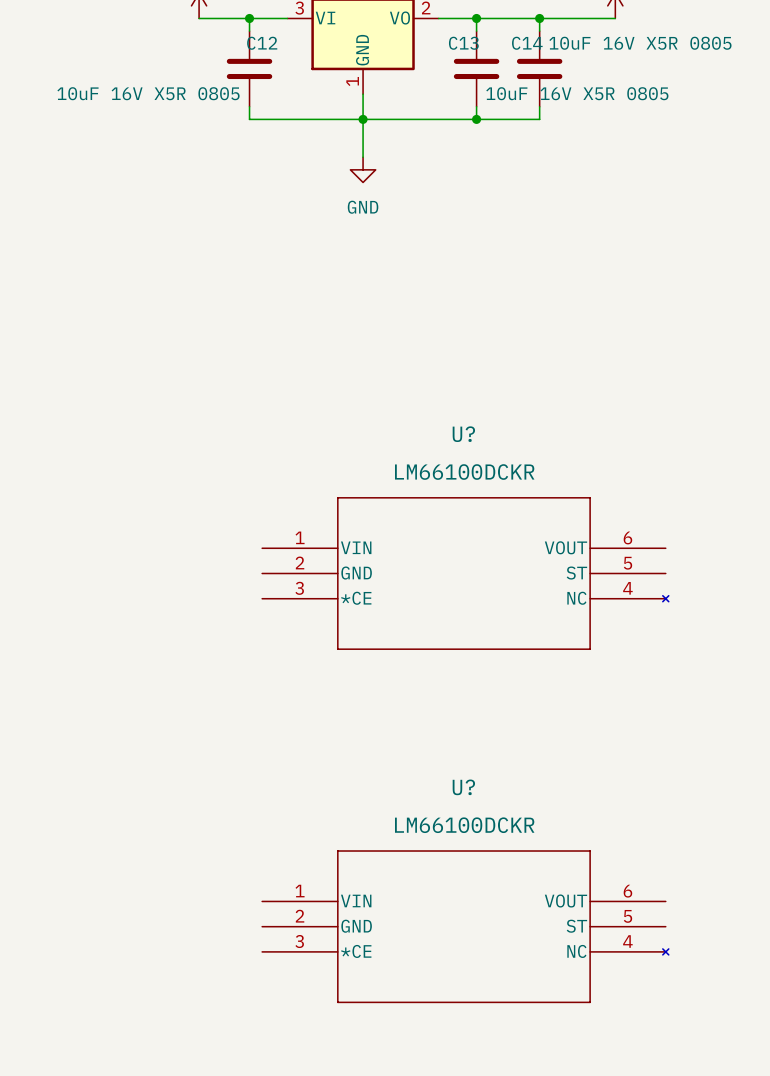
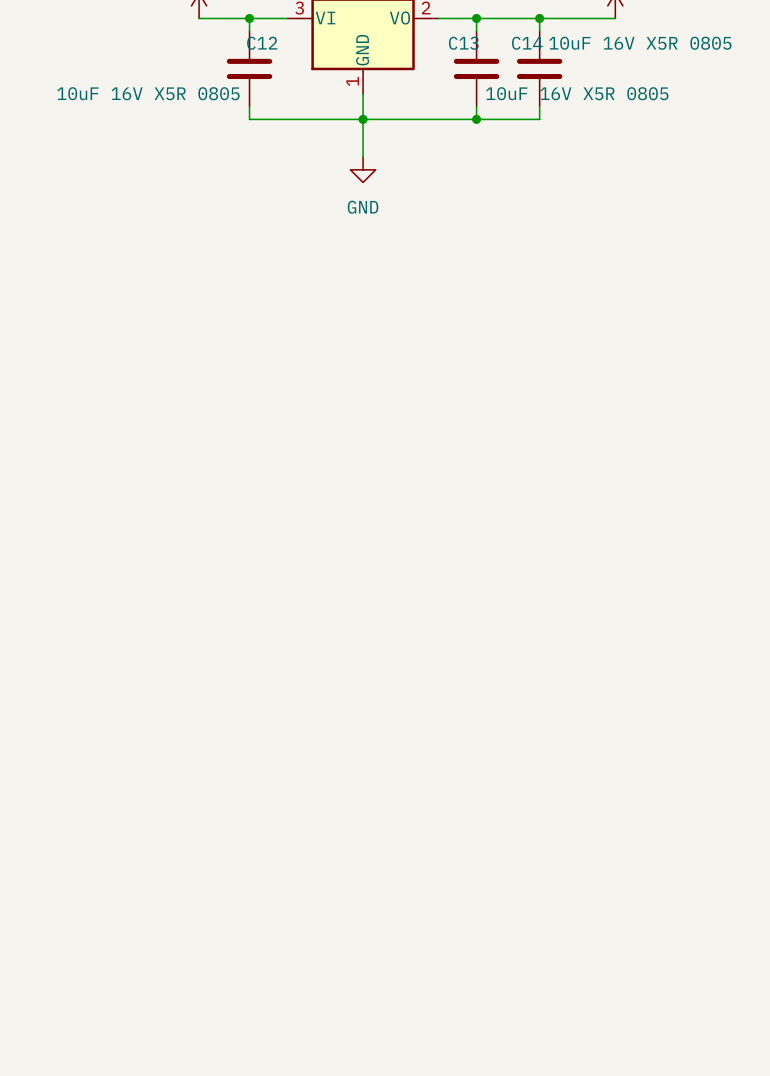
U?: LM66100DCKR (465, 573) -> none
U?: LM66100DCKR (465, 926) -> none

